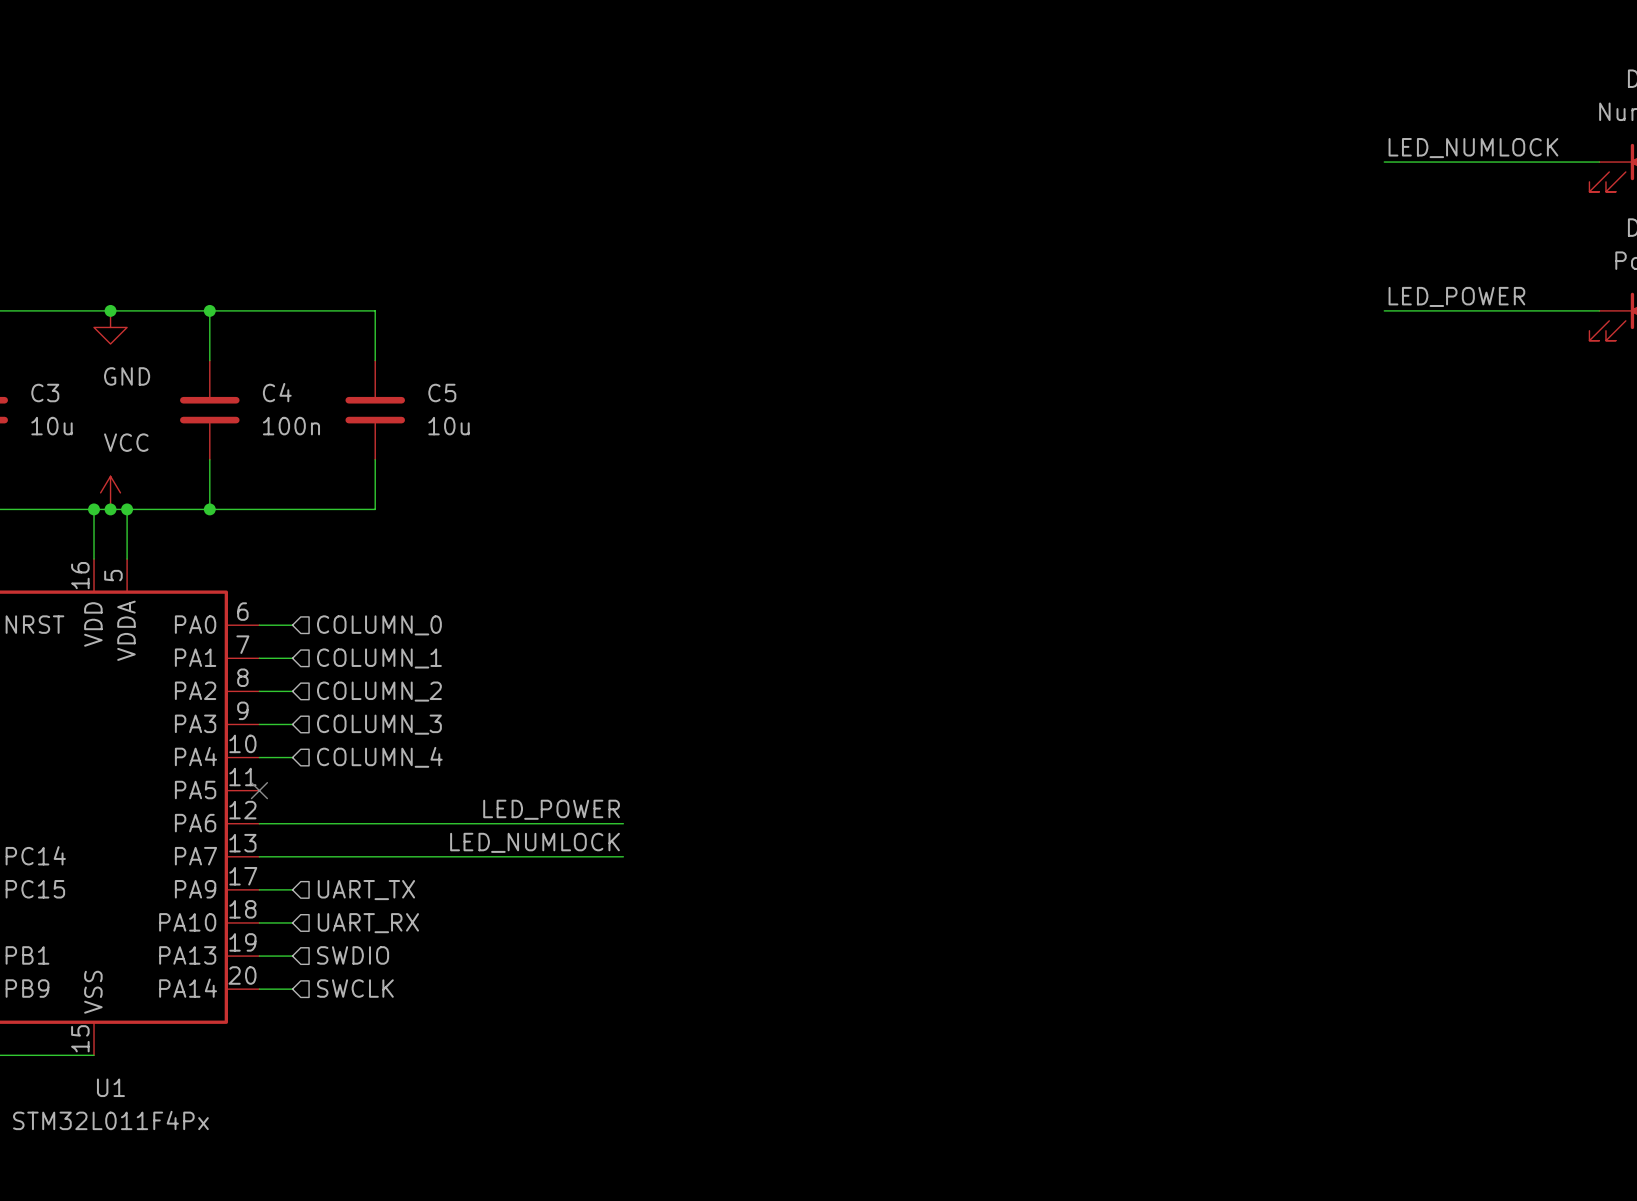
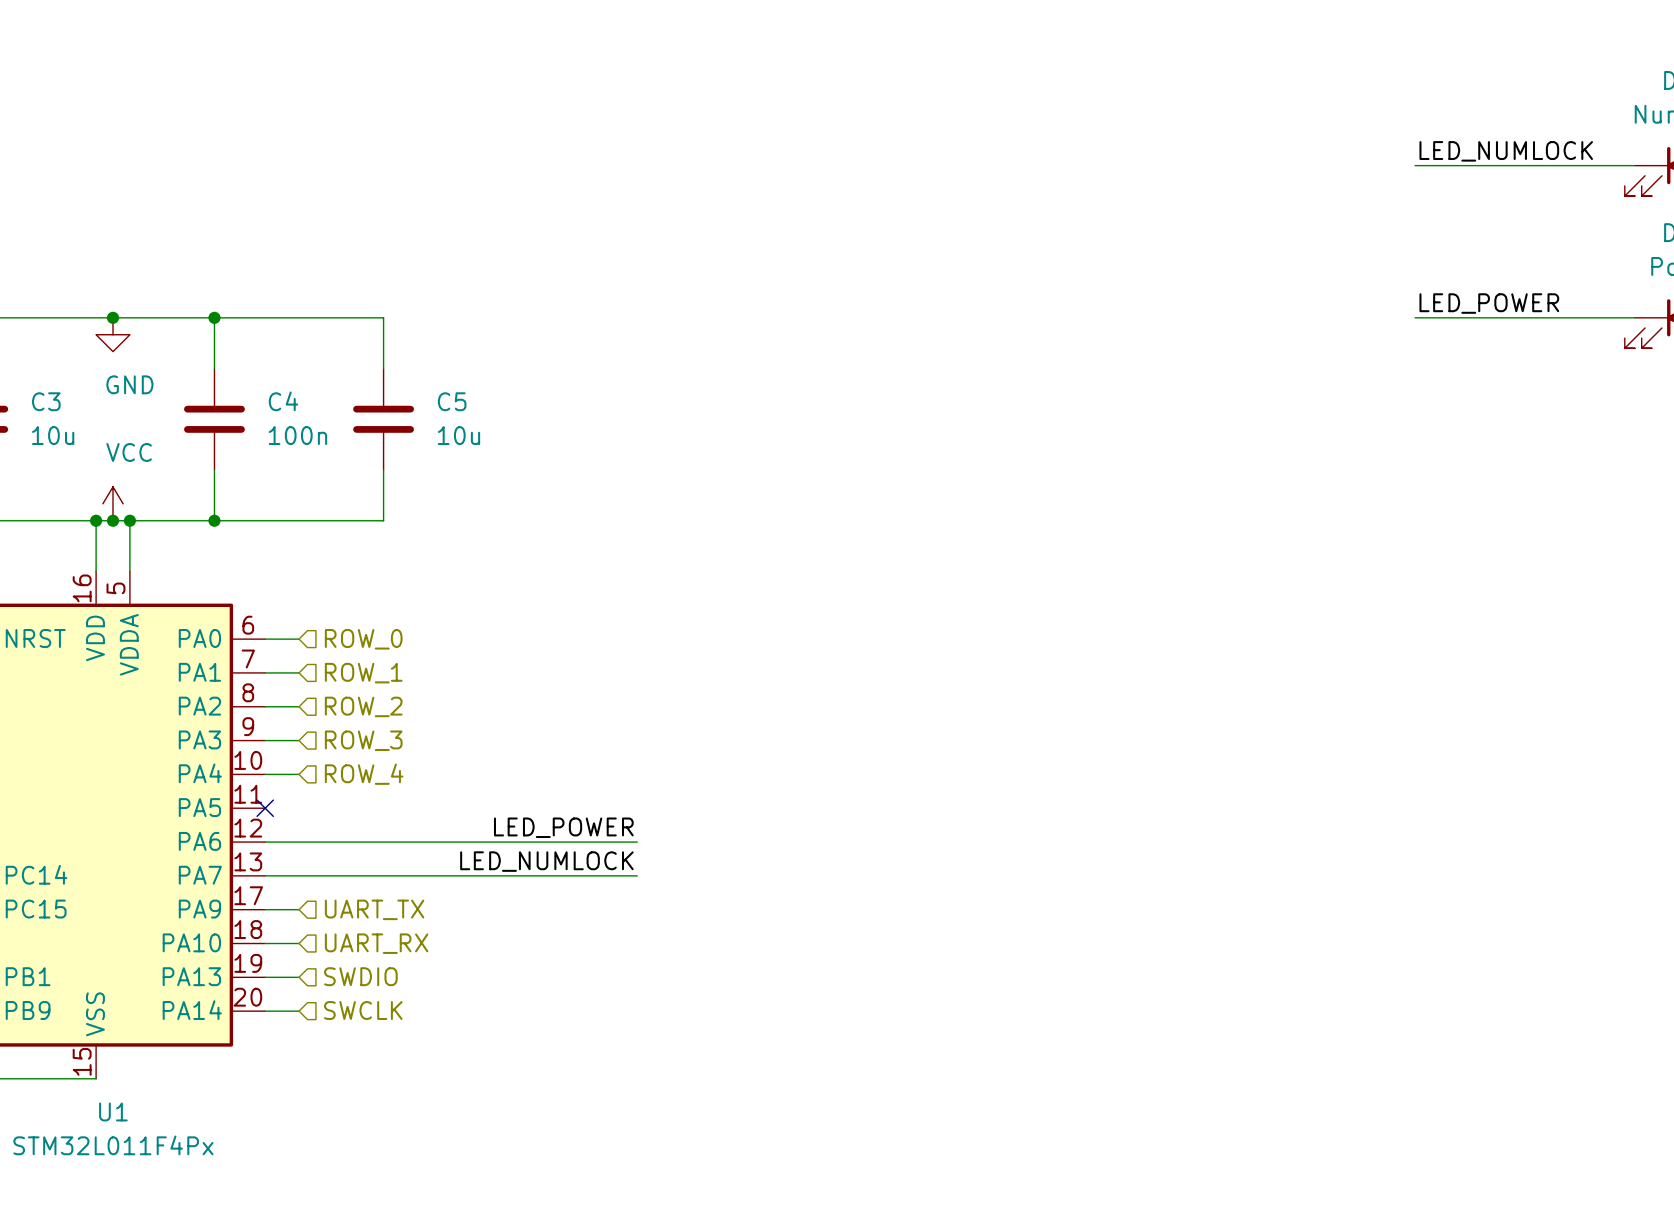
hierarchical label: COLUMN_0 (379, 625) -> ROW_0 (363, 639)
hierarchical label: COLUMN_1 (379, 658) -> ROW_1 (363, 673)
hierarchical label: COLUMN_2 (379, 691) -> ROW_2 (363, 706)
hierarchical label: COLUMN_3 (379, 724) -> ROW_3 (363, 740)
hierarchical label: COLUMN_4 (379, 757) -> ROW_4 (364, 774)

